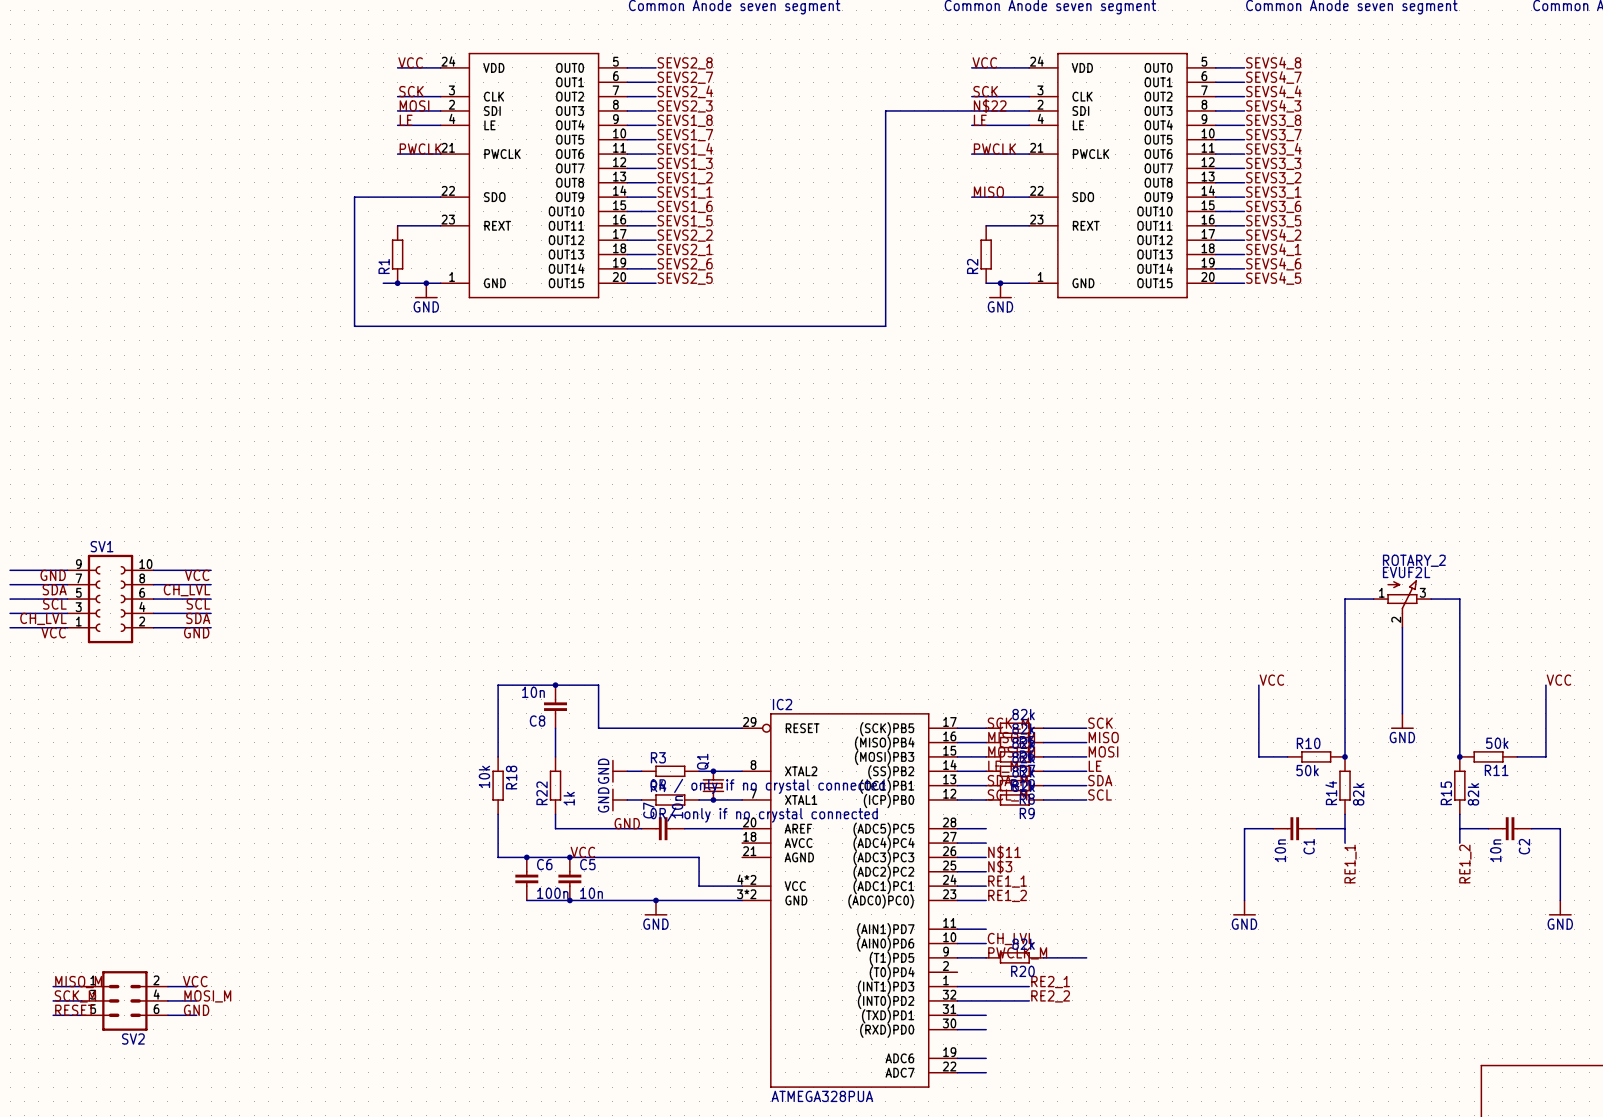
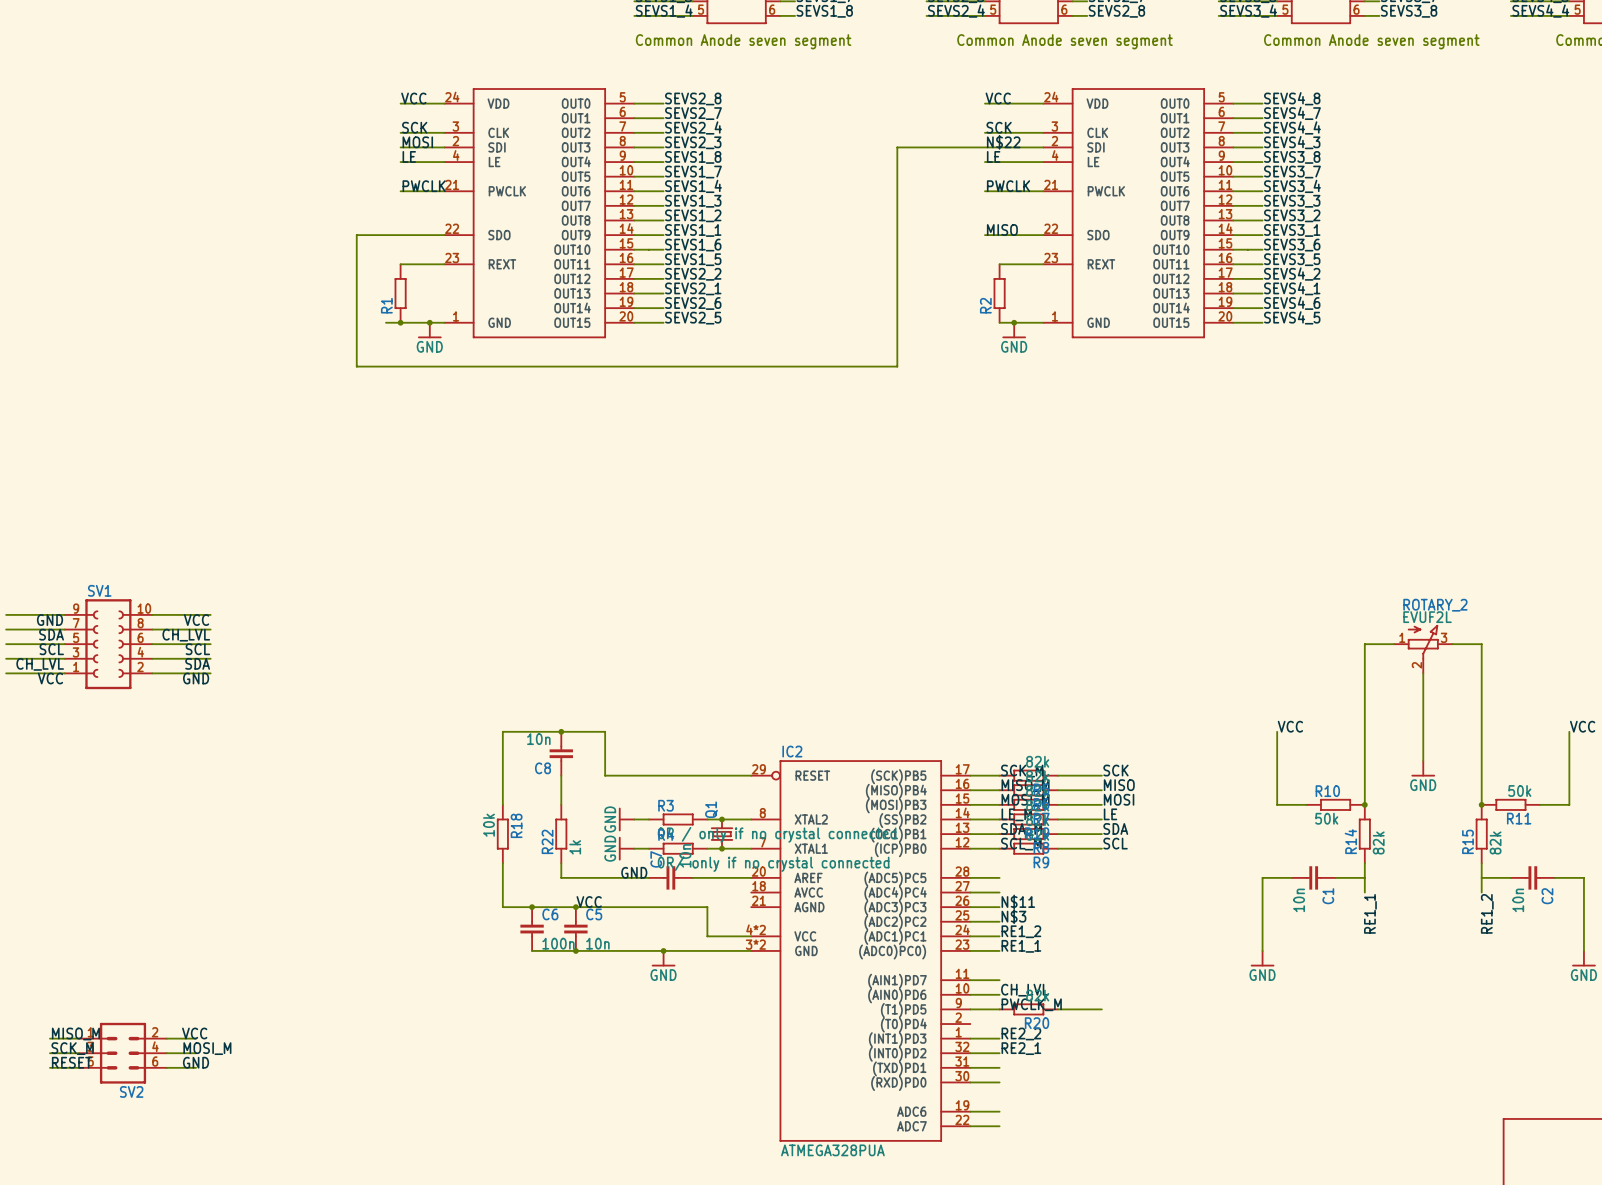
label: RE1_1 (1007, 881) -> RE1_2 (1021, 931)
label: RE1_2 (1007, 895) -> RE1_1 (1021, 946)
label position: RE2_1 (1050, 982) -> RE2_1 (1021, 1048)
wire: (986, 986) (1029, 986) -> none
label position: RE2_2 (1050, 996) -> RE2_2 (1021, 1034)
wire: (986, 1000) (1029, 1000) -> none

